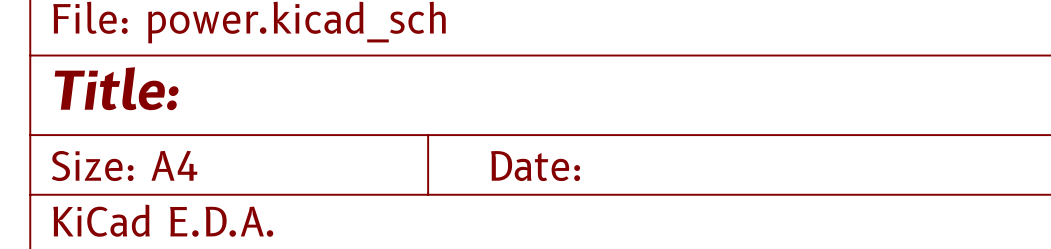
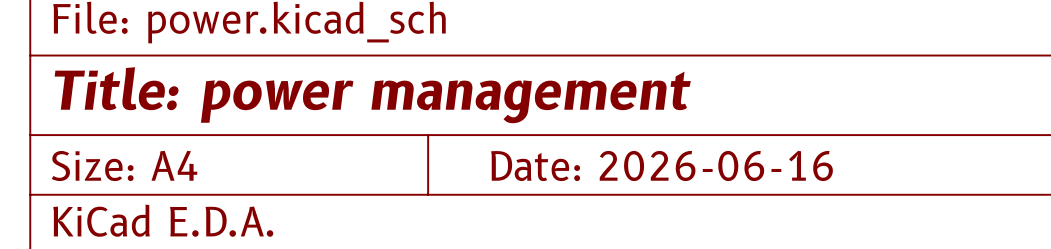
title block: Title: (116, 88) -> Title: power management (372, 95)
title block: Date: (535, 166) -> Date: 2026-06-16 (662, 165)

